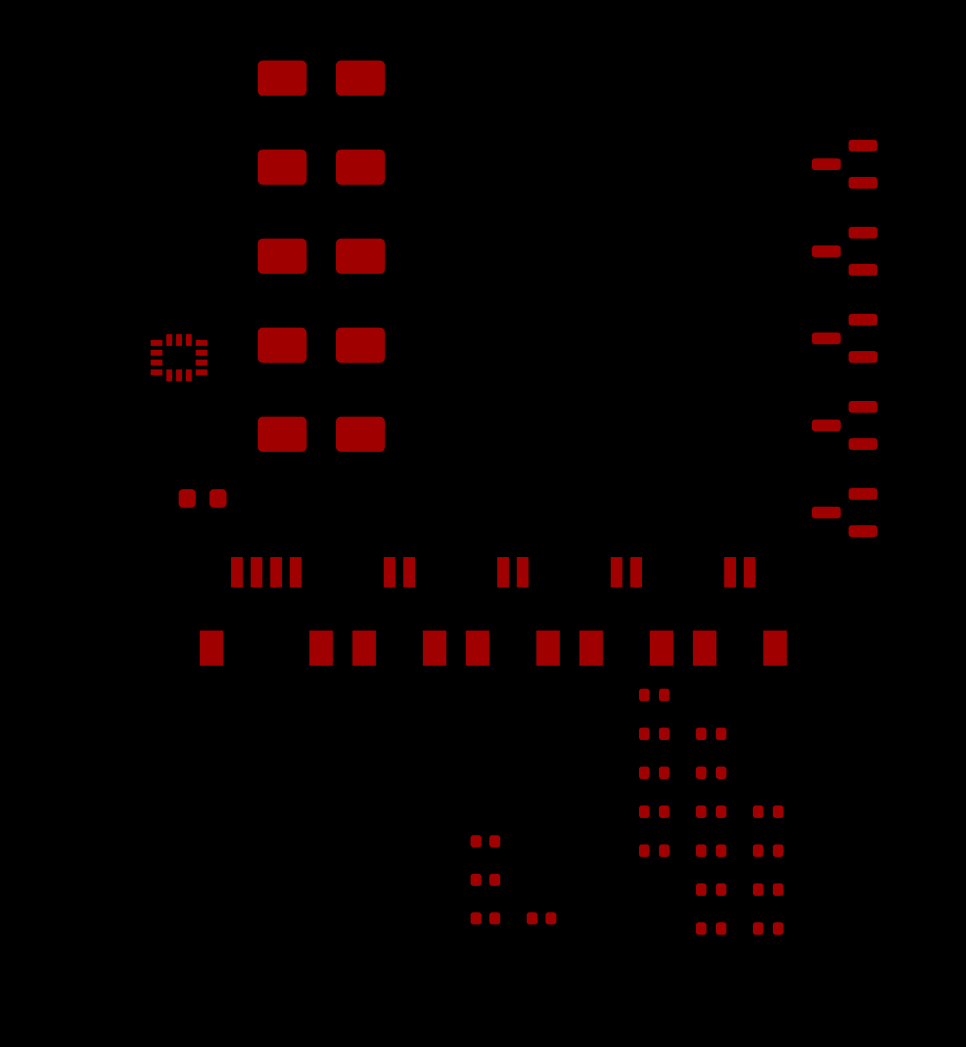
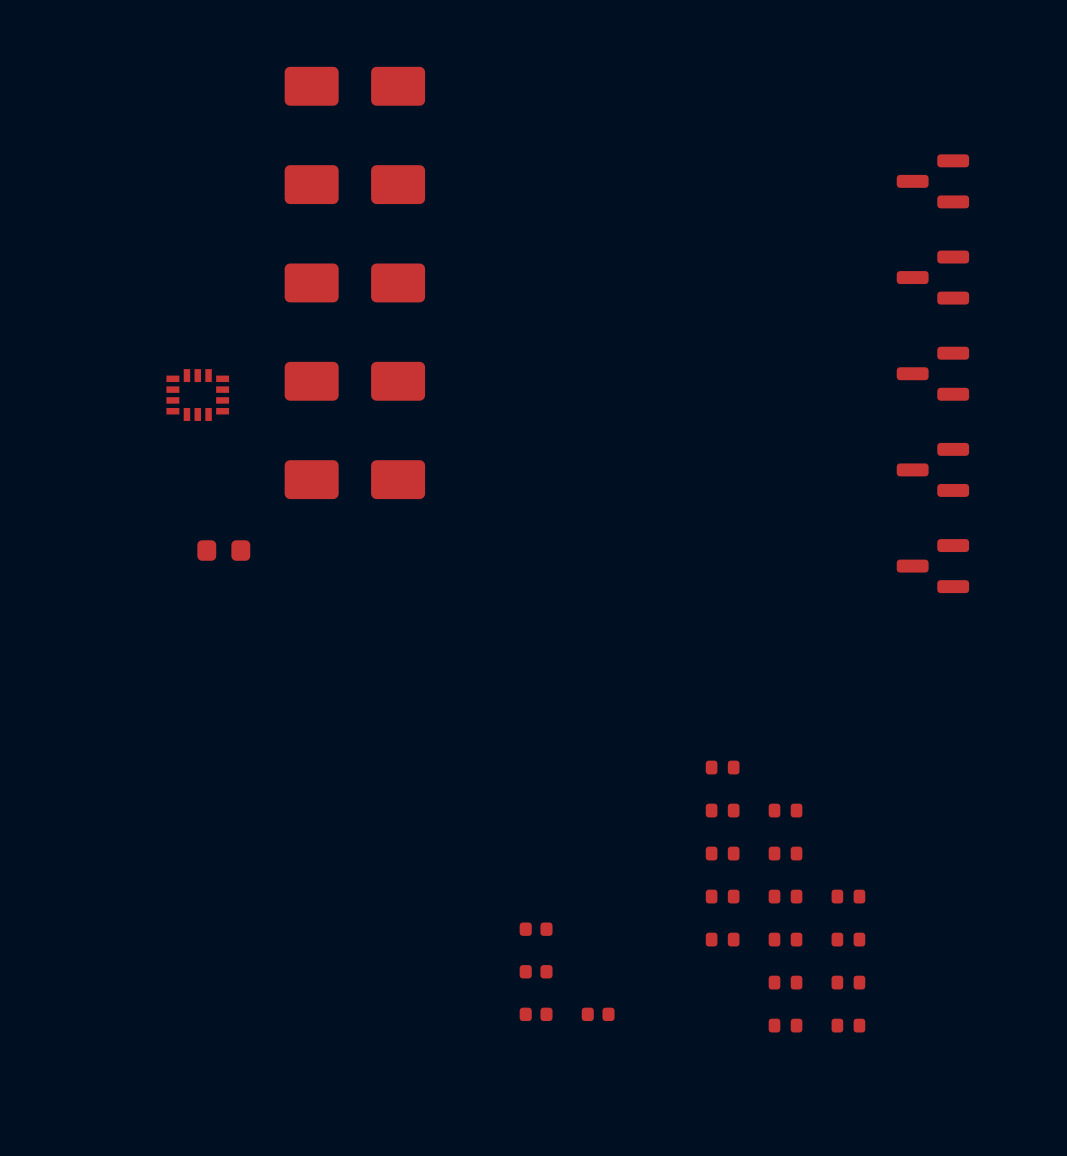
part: (266, 611) -> none
part: (399, 611) -> none
part: (512, 611) -> none
part: (626, 611) -> none
part: (739, 611) -> none

